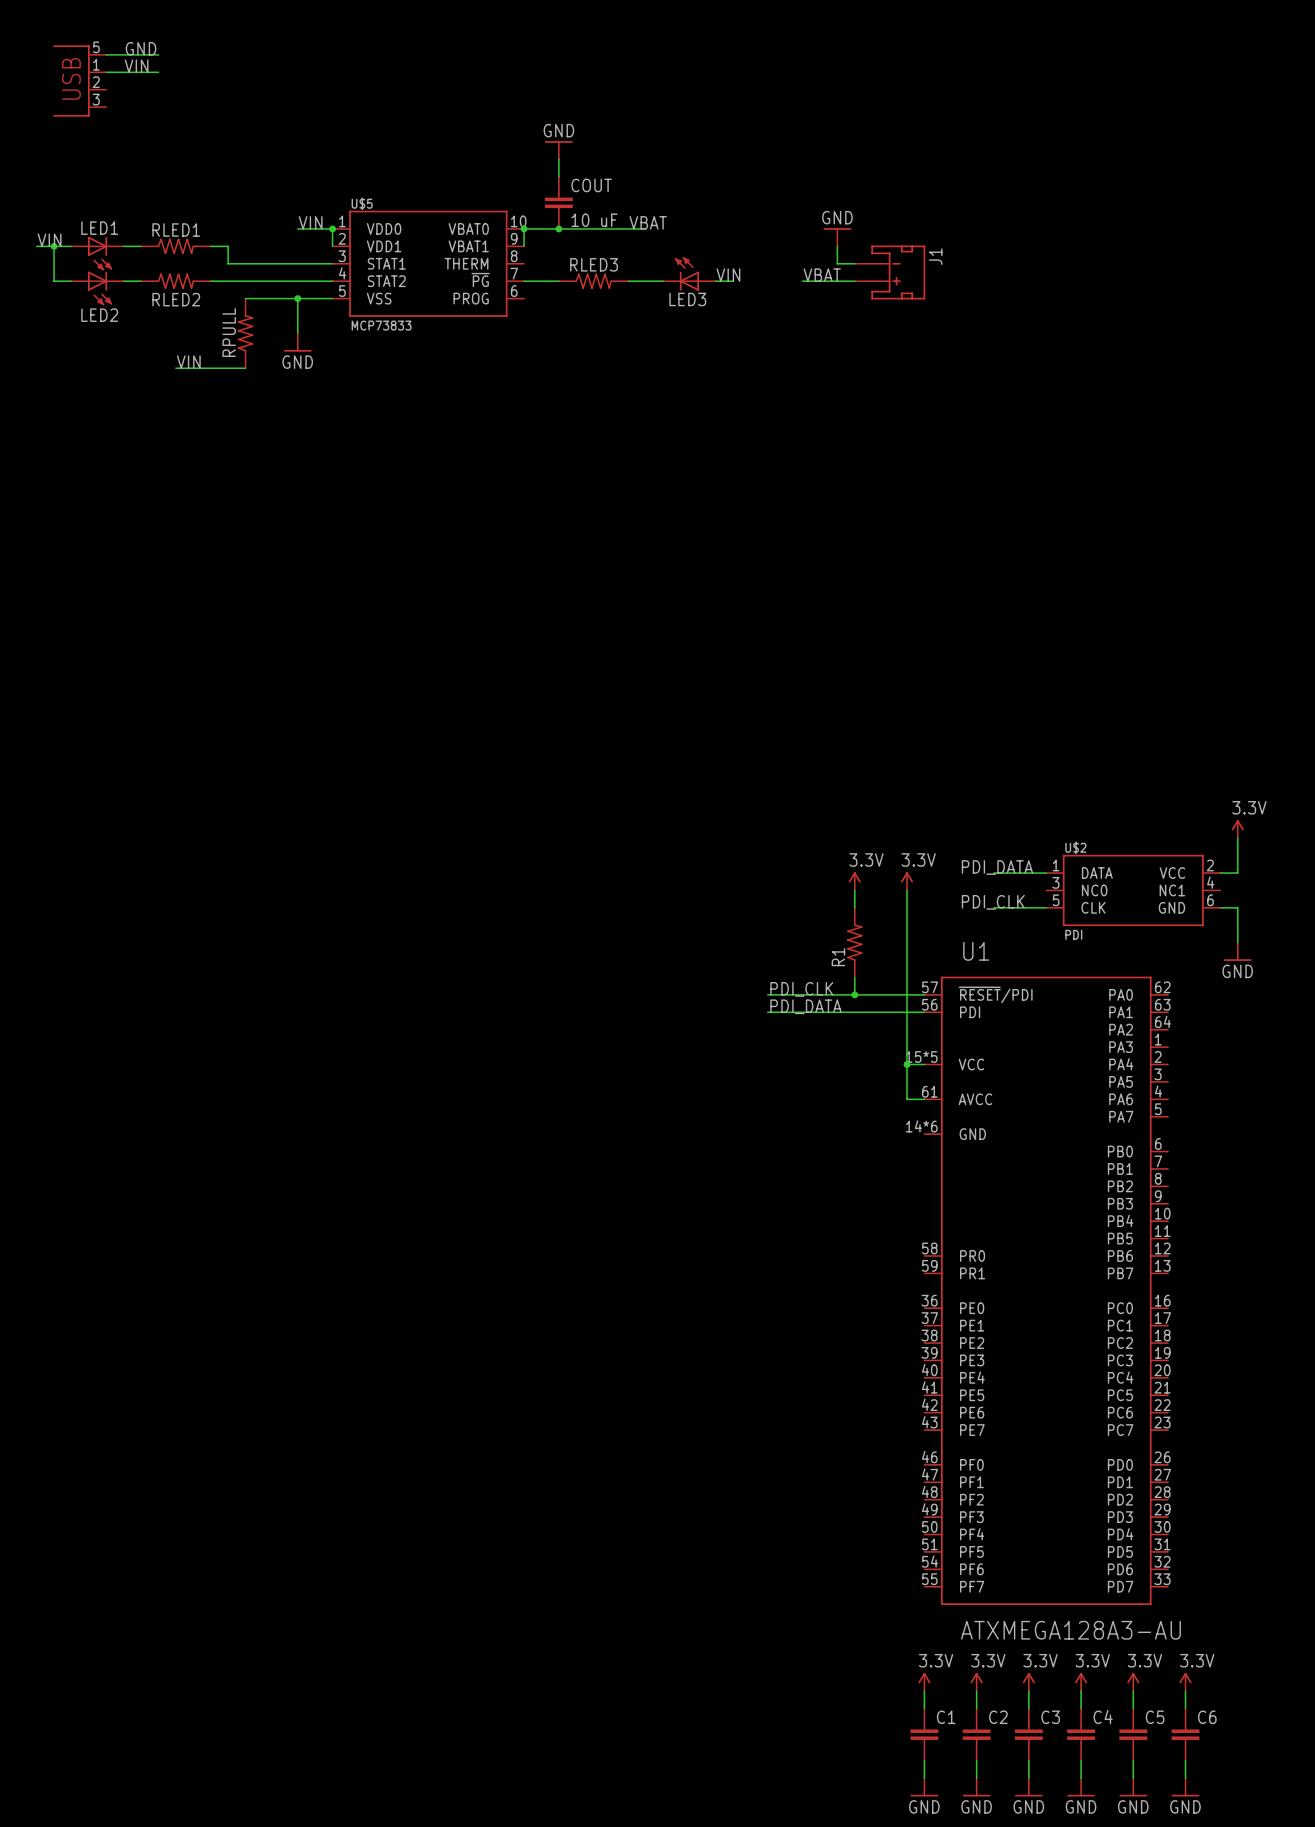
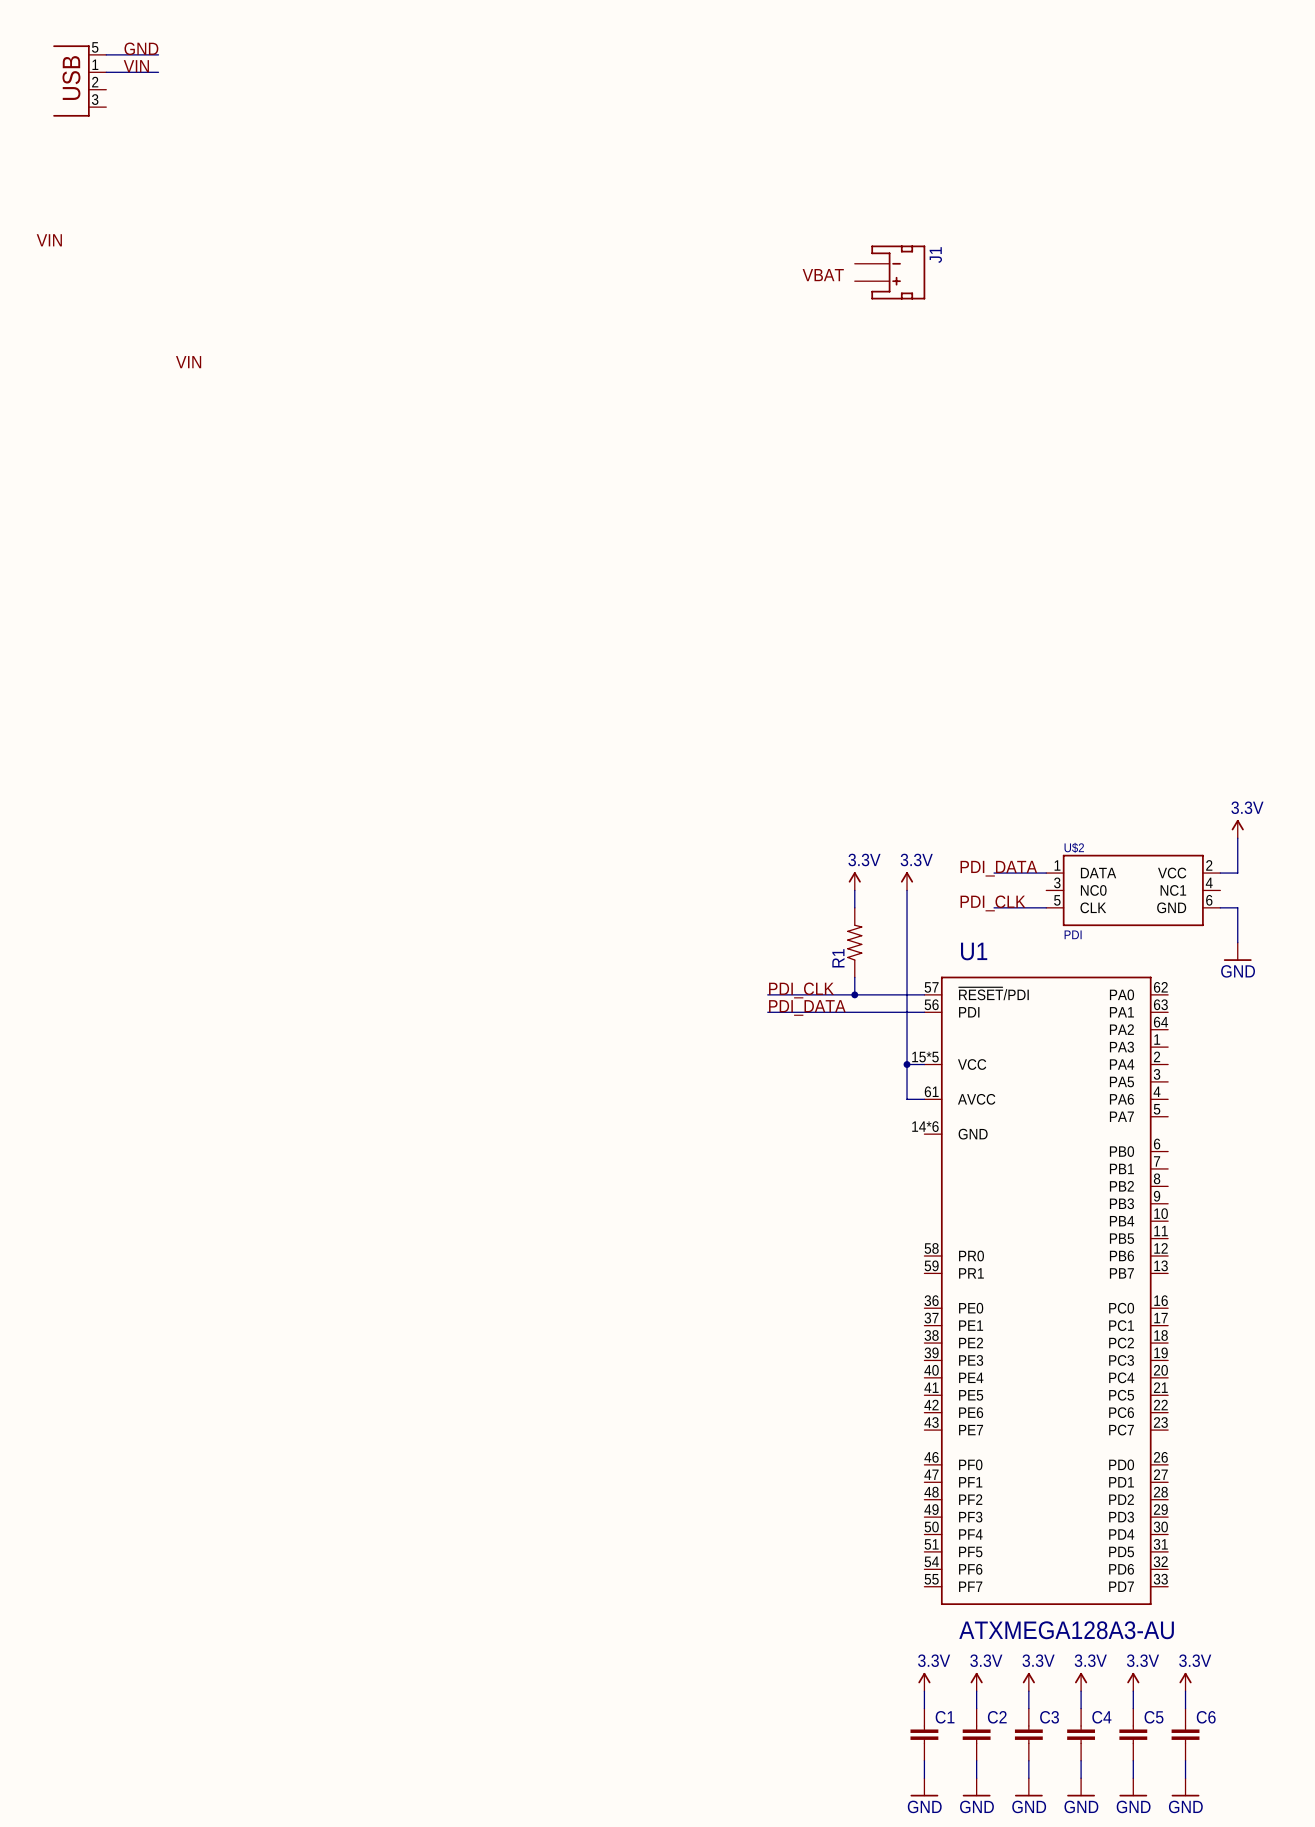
power symbol: GND (558, 150) -> none
wire: (558, 159) (558, 176) -> none
COUT: 10 uF (558, 202) -> none
label: VIN (310, 222) -> none
label: VBAT (648, 222) -> none
wire: (297, 228) (332, 228) (332, 246) -> none
junction: (332, 228) -> none
junction: (524, 228) -> none
junction: (558, 228) -> none
wire: (645, 228) (524, 228) (524, 246) -> none
power symbol: GND (837, 237) -> none
wire: (36, 246) (71, 246) -> none
wire: (54, 246) (54, 281) (71, 281) -> none
junction: (54, 246) -> none
wire: (123, 246) (141, 246) -> none
RLED1: (175, 246) -> none
wire: (210, 246) (228, 246) (228, 263) (332, 263) -> none
wire: (837, 246) (837, 263) (854, 263) -> none
LED1: (97, 253) -> none
U$5: MCP73833 (428, 263) -> none
LED3: (689, 273) -> none
label: VIN (728, 275) -> none
wire: (123, 281) (141, 281) -> none
RLED2: (175, 281) -> none
wire: (210, 281) (332, 281) -> none
wire: (524, 281) (558, 281) -> none
RLED3: (593, 281) -> none
wire: (628, 281) (663, 281) -> none
wire: (715, 281) (732, 281) -> none
wire: (802, 281) (854, 281) -> none
LED2: (97, 288) -> none
wire: (245, 298) (332, 298) -> none
wire: (297, 298) (297, 333) -> none
junction: (297, 298) -> none
RPULL: (245, 333) -> none
power symbol: GND (297, 342) -> none
wire: (175, 368) (245, 368) -> none

